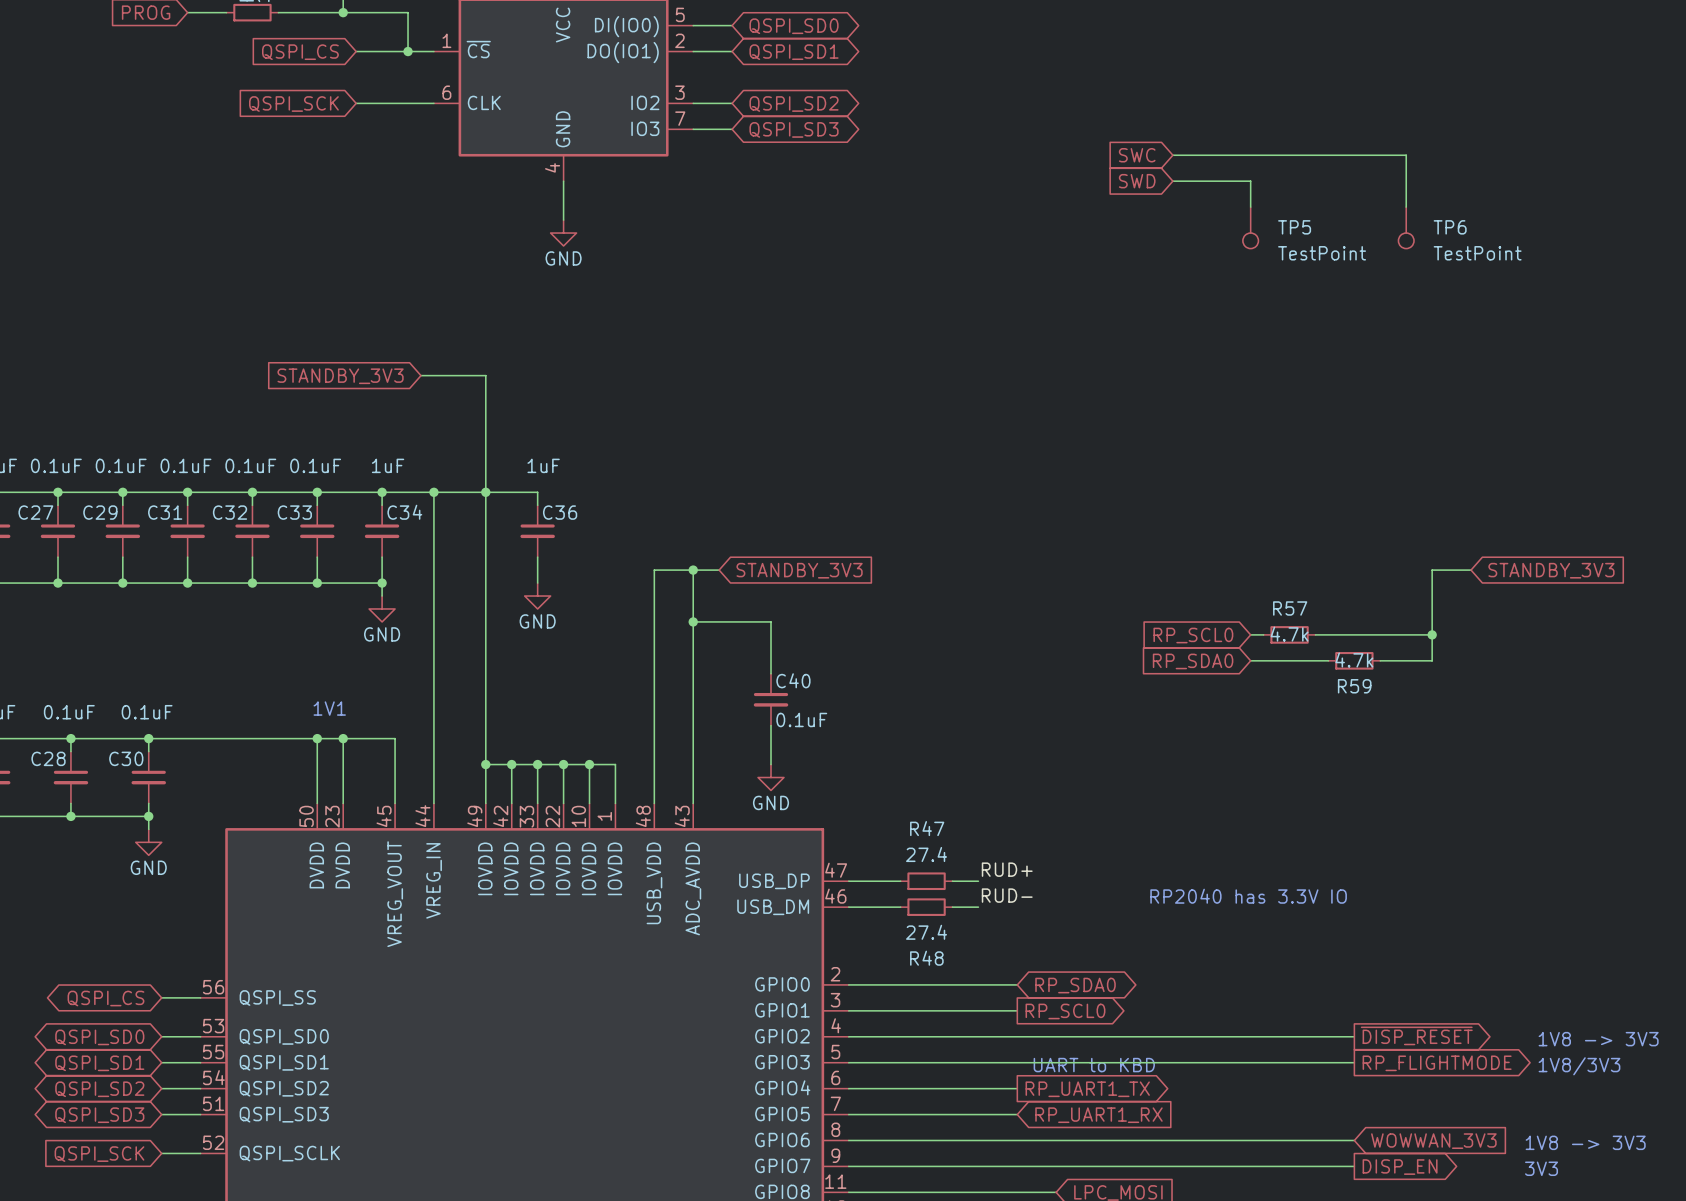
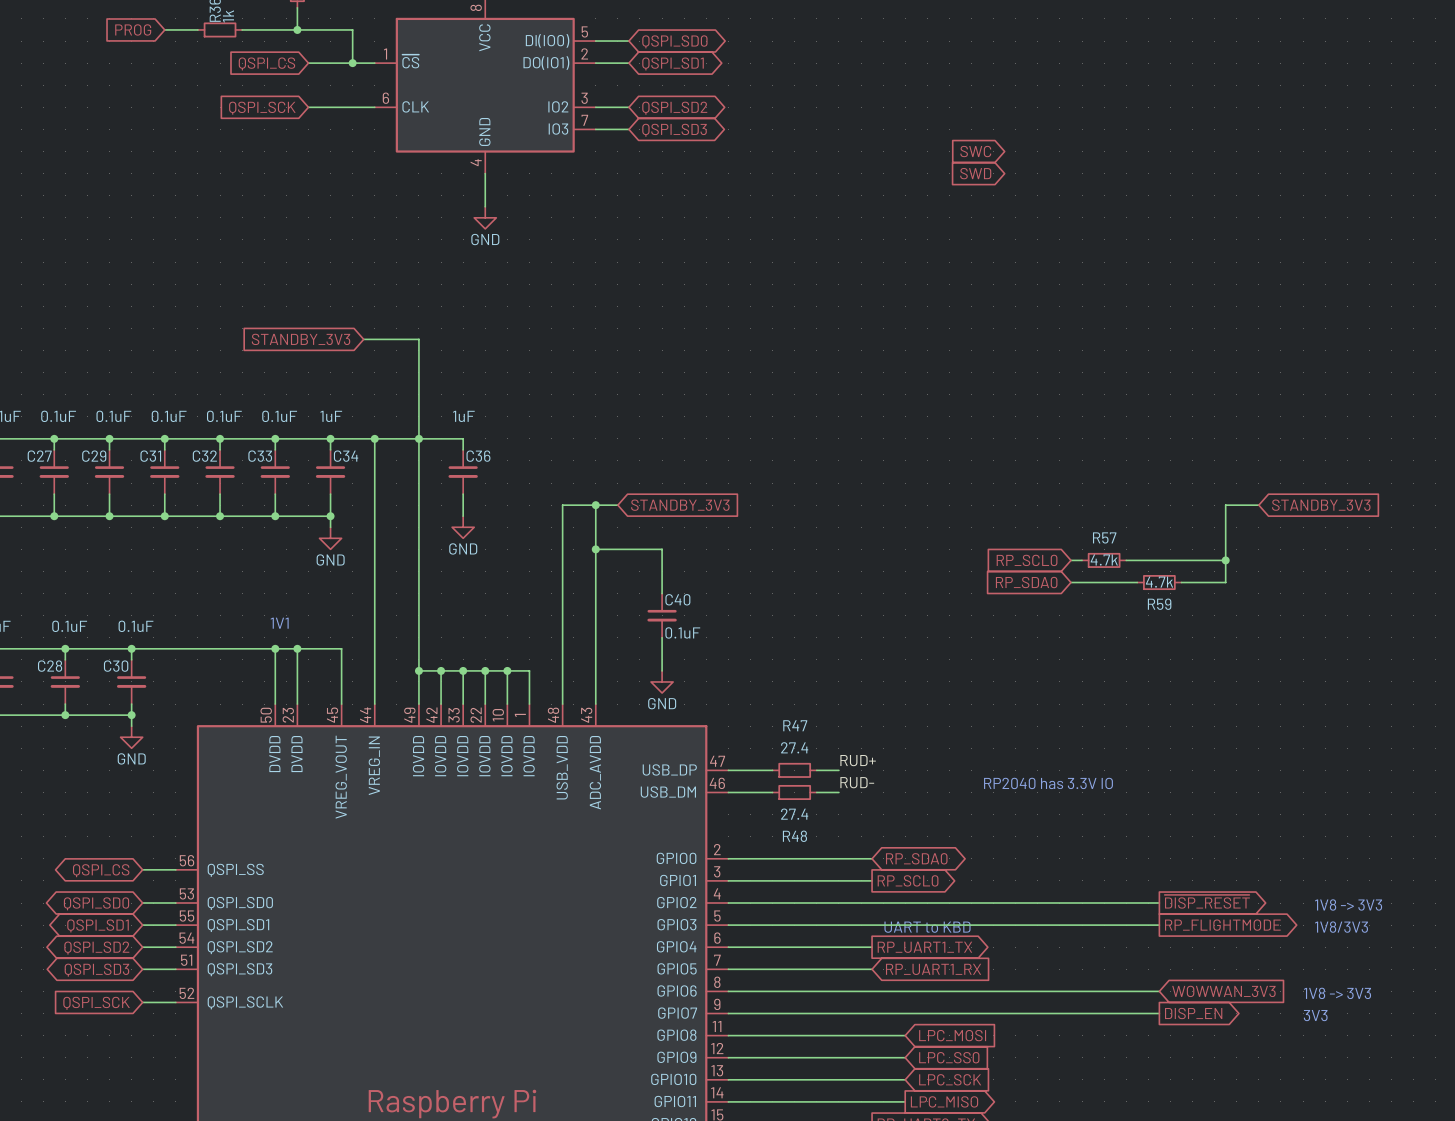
wire: (1172, 155) (1406, 155) (1406, 207) -> none
wire: (1172, 181) (1250, 181) (1250, 207) -> none
TP5: TestPoint (1250, 227) -> none
TP6: TestPoint (1406, 227) -> none

